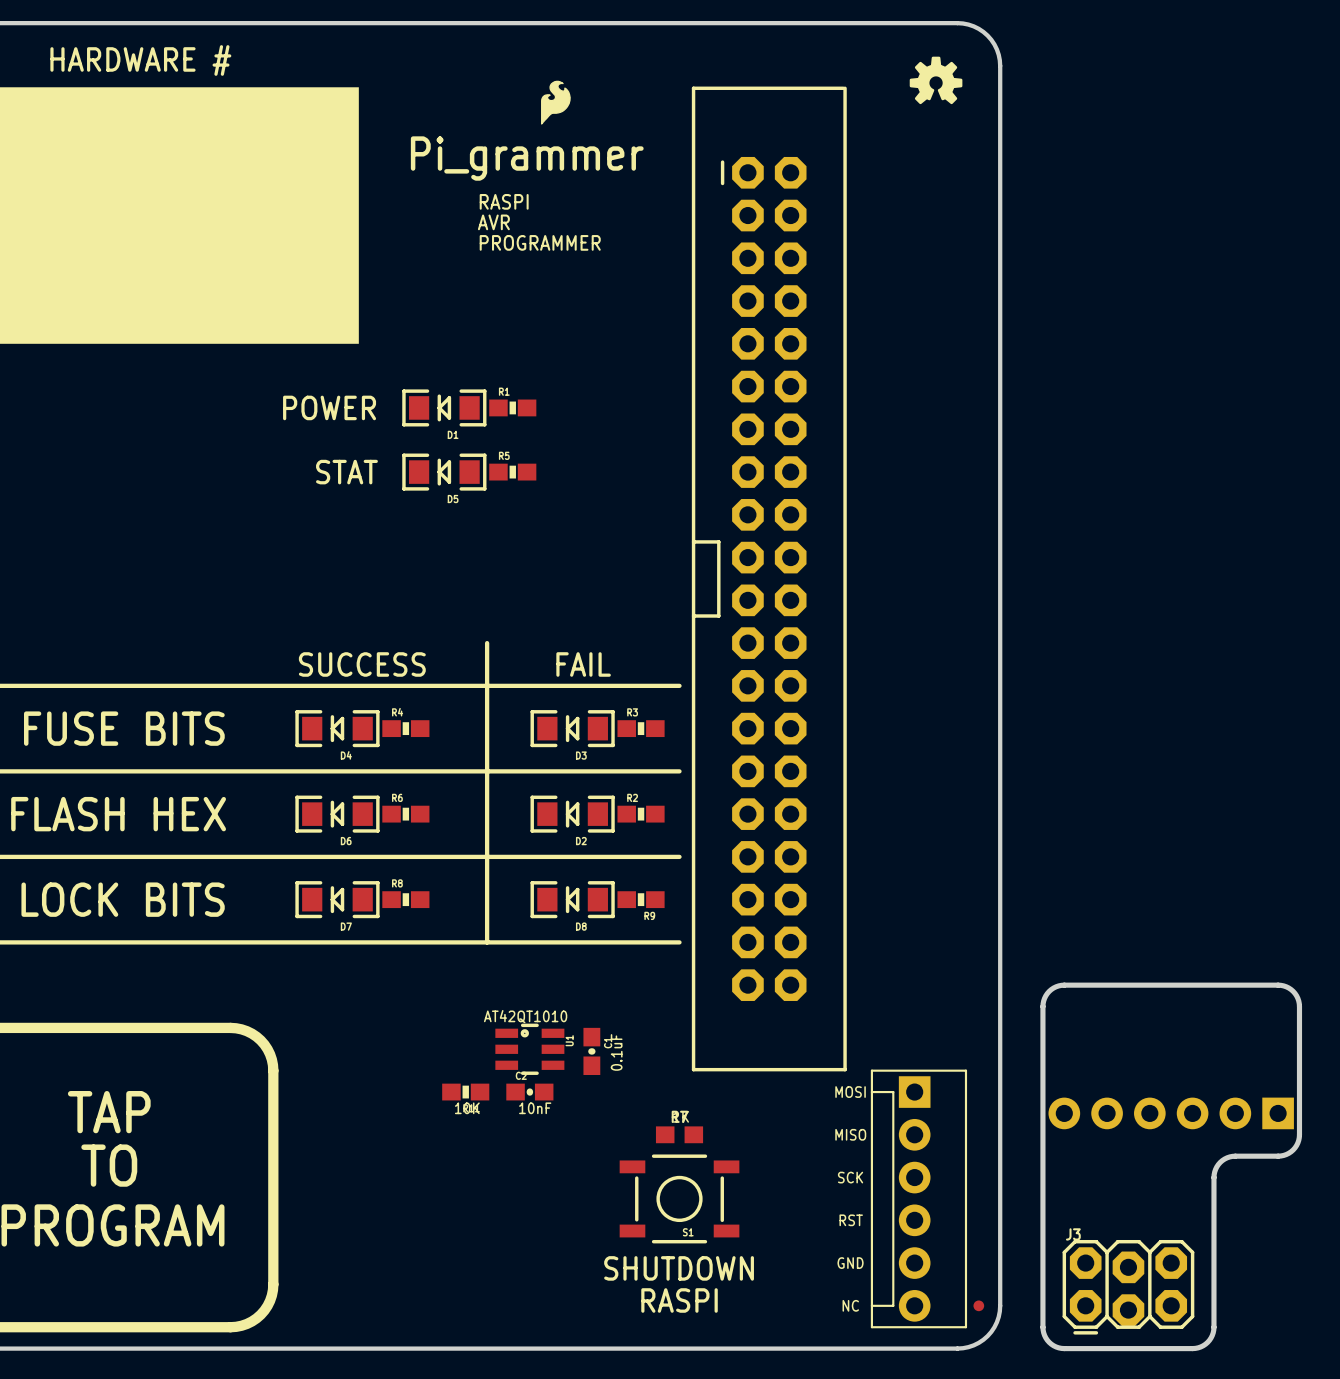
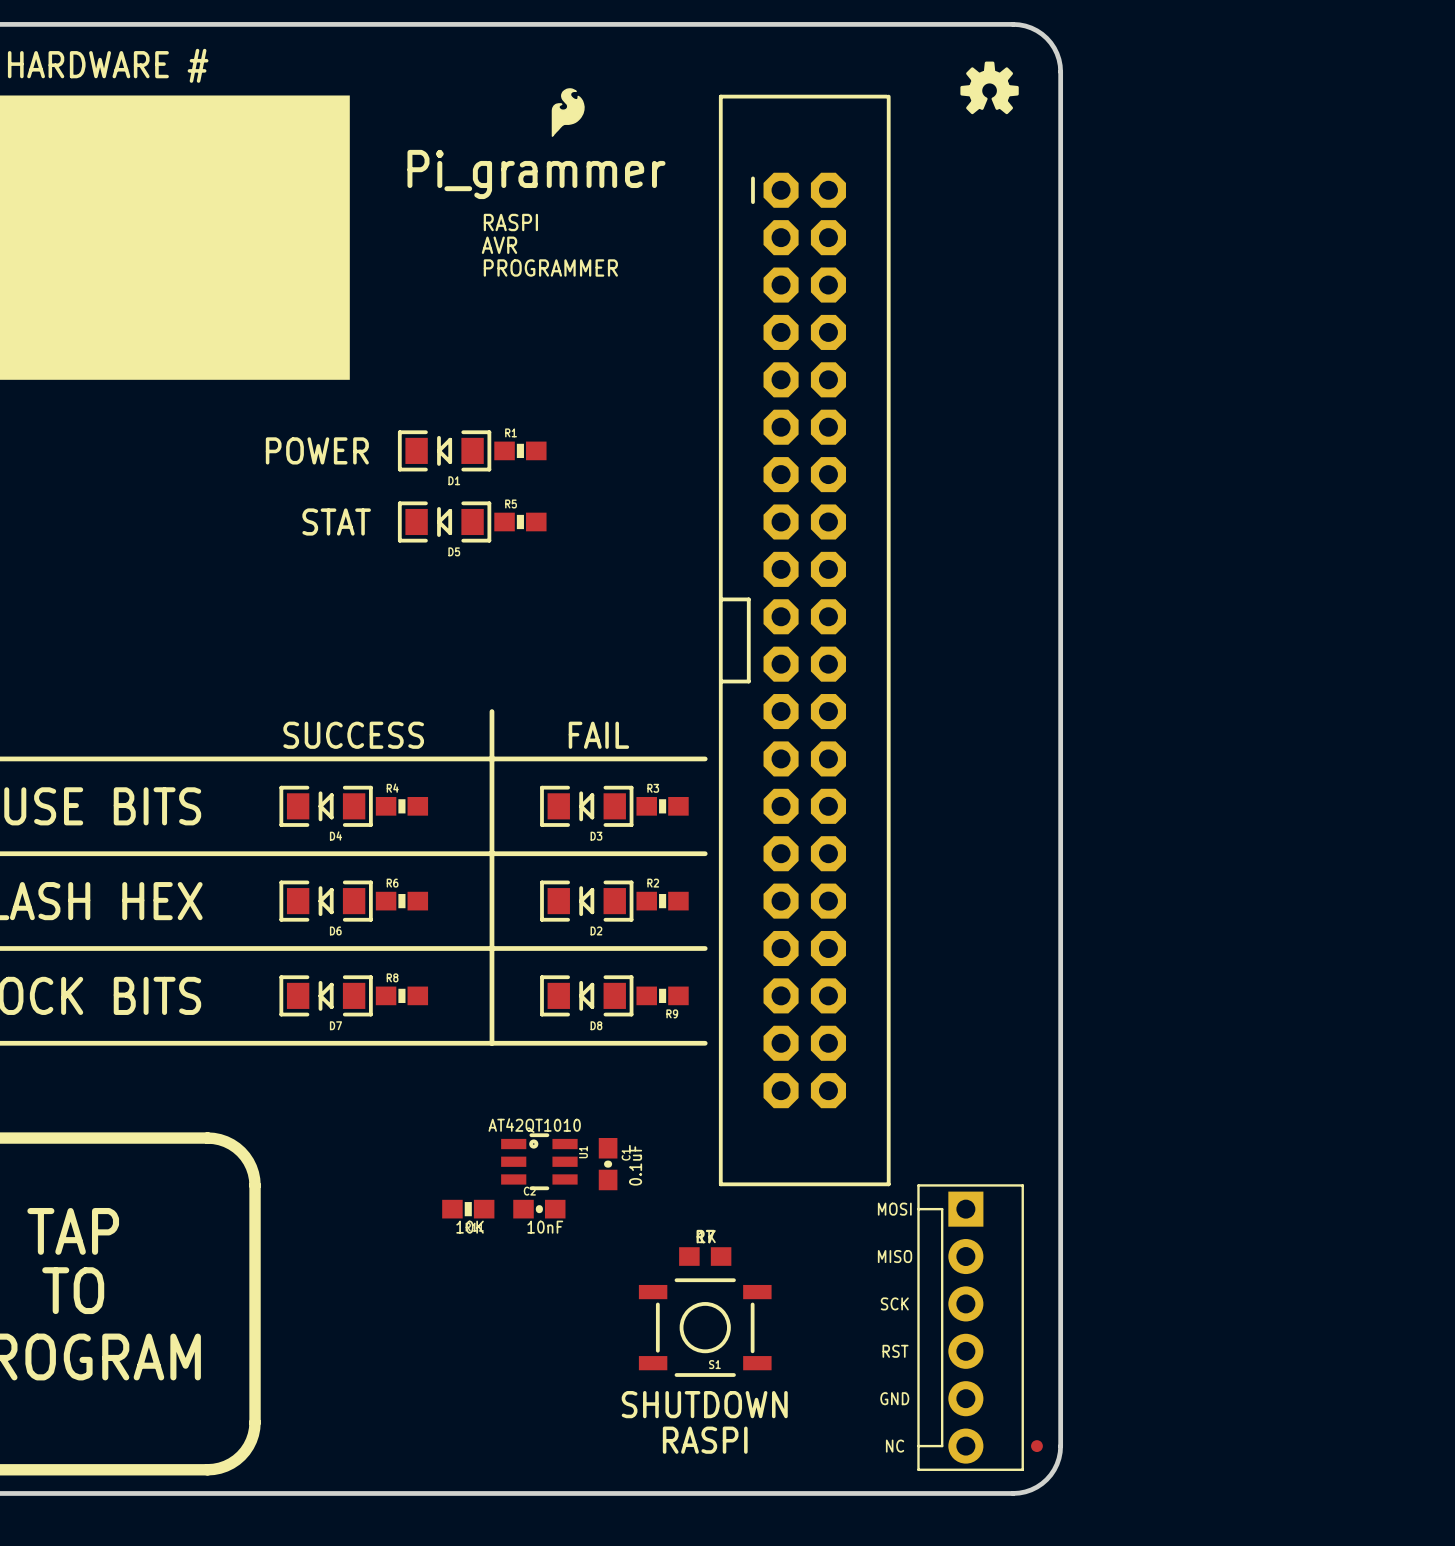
board edge: (1064, 985) (1278, 985) (1288, 988) (1297, 998) (1299, 1006) (1298, 1140) (1295, 1147) (1286, 1154) (1229, 1156) (1222, 1160) (1215, 1169) (1213, 1177) (1213, 1330) (1209, 1340) (1200, 1346) (1192, 1348) (1061, 1348) (1051, 1344) (1044, 1335) (1042, 1327) (1042, 1006) (1044, 998) (1049, 991) (1056, 986) (1064, 985) -> none
part: (1171, 1113) -> none
J3: (1128, 1287) -> none

